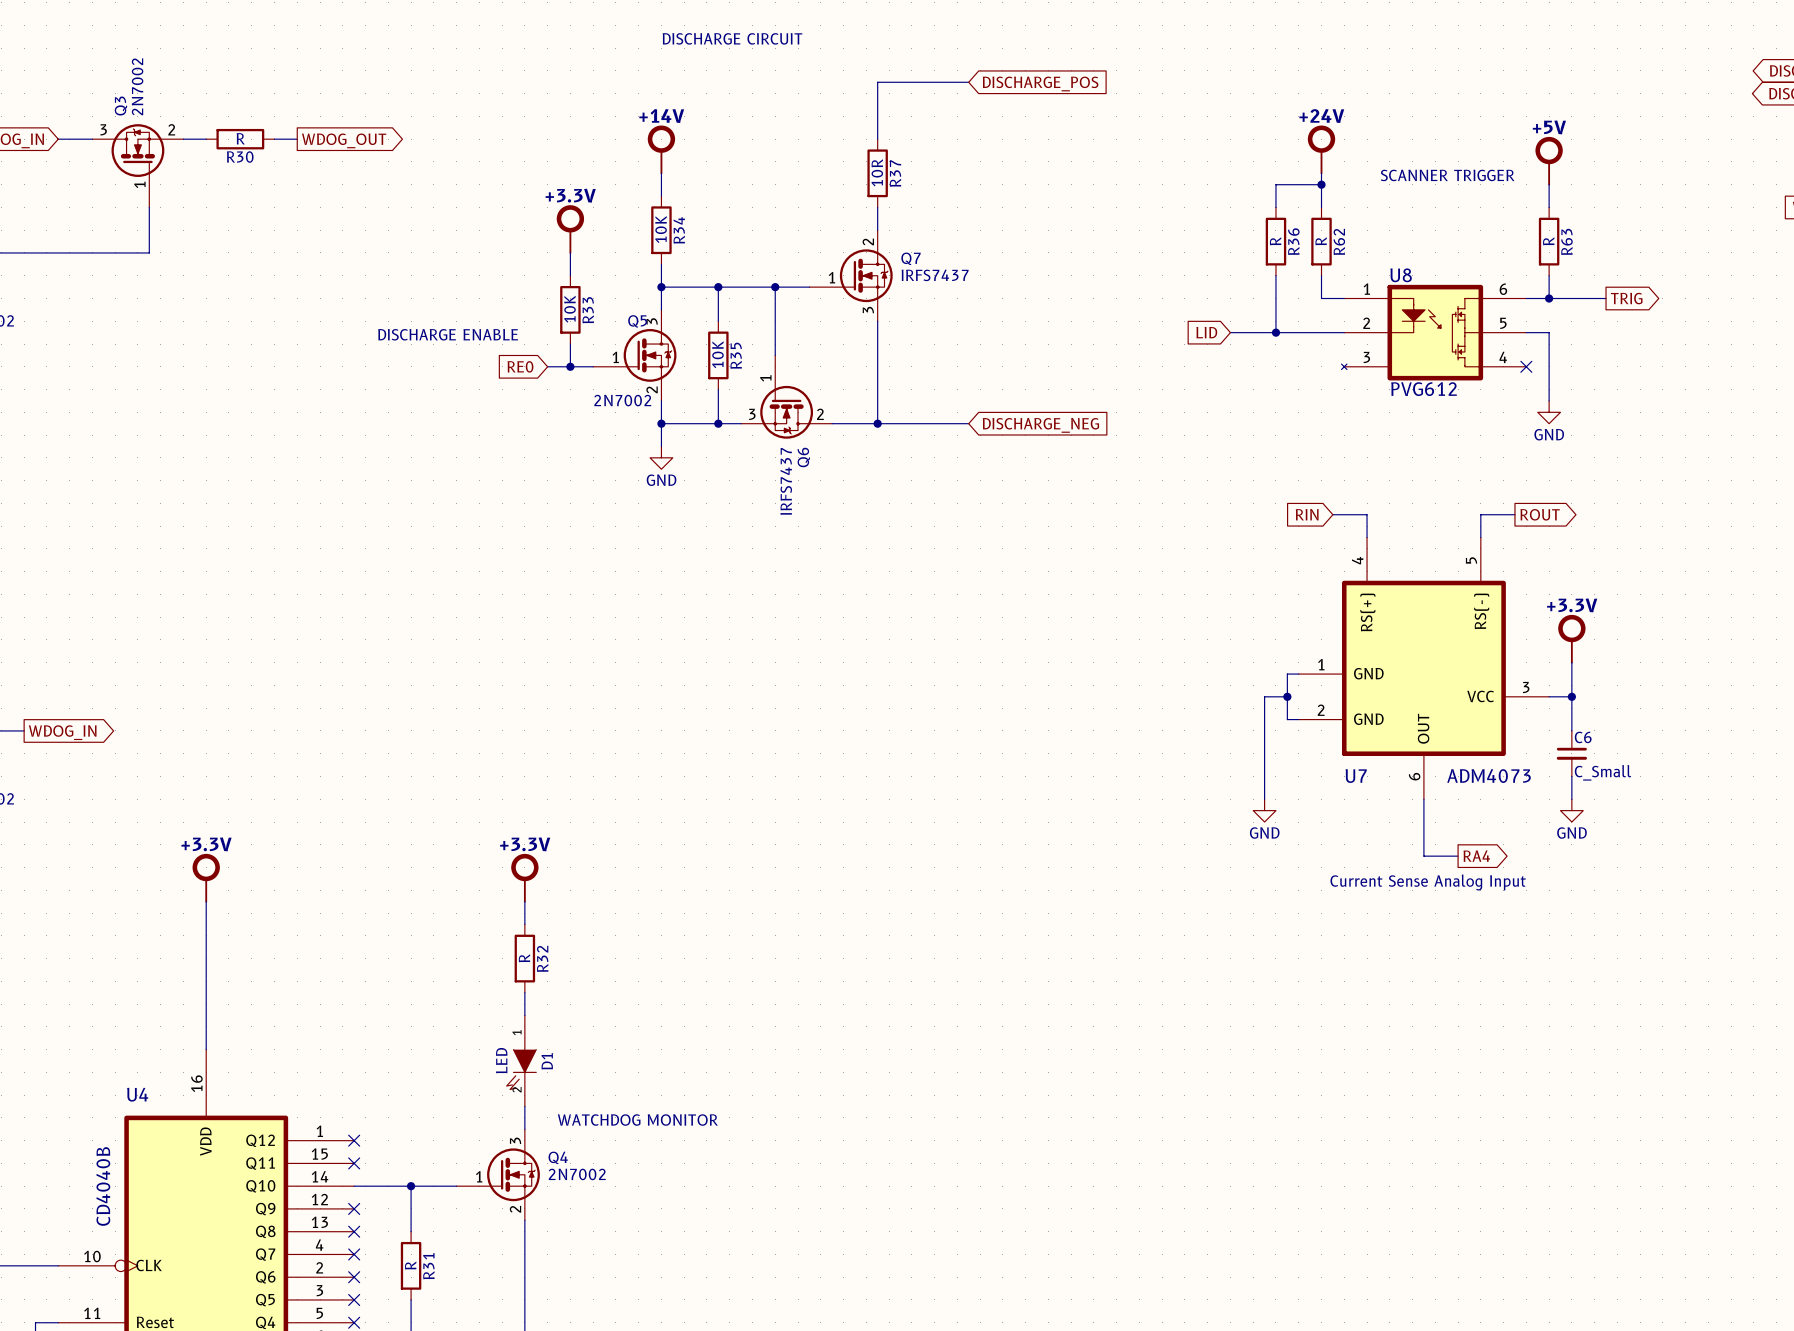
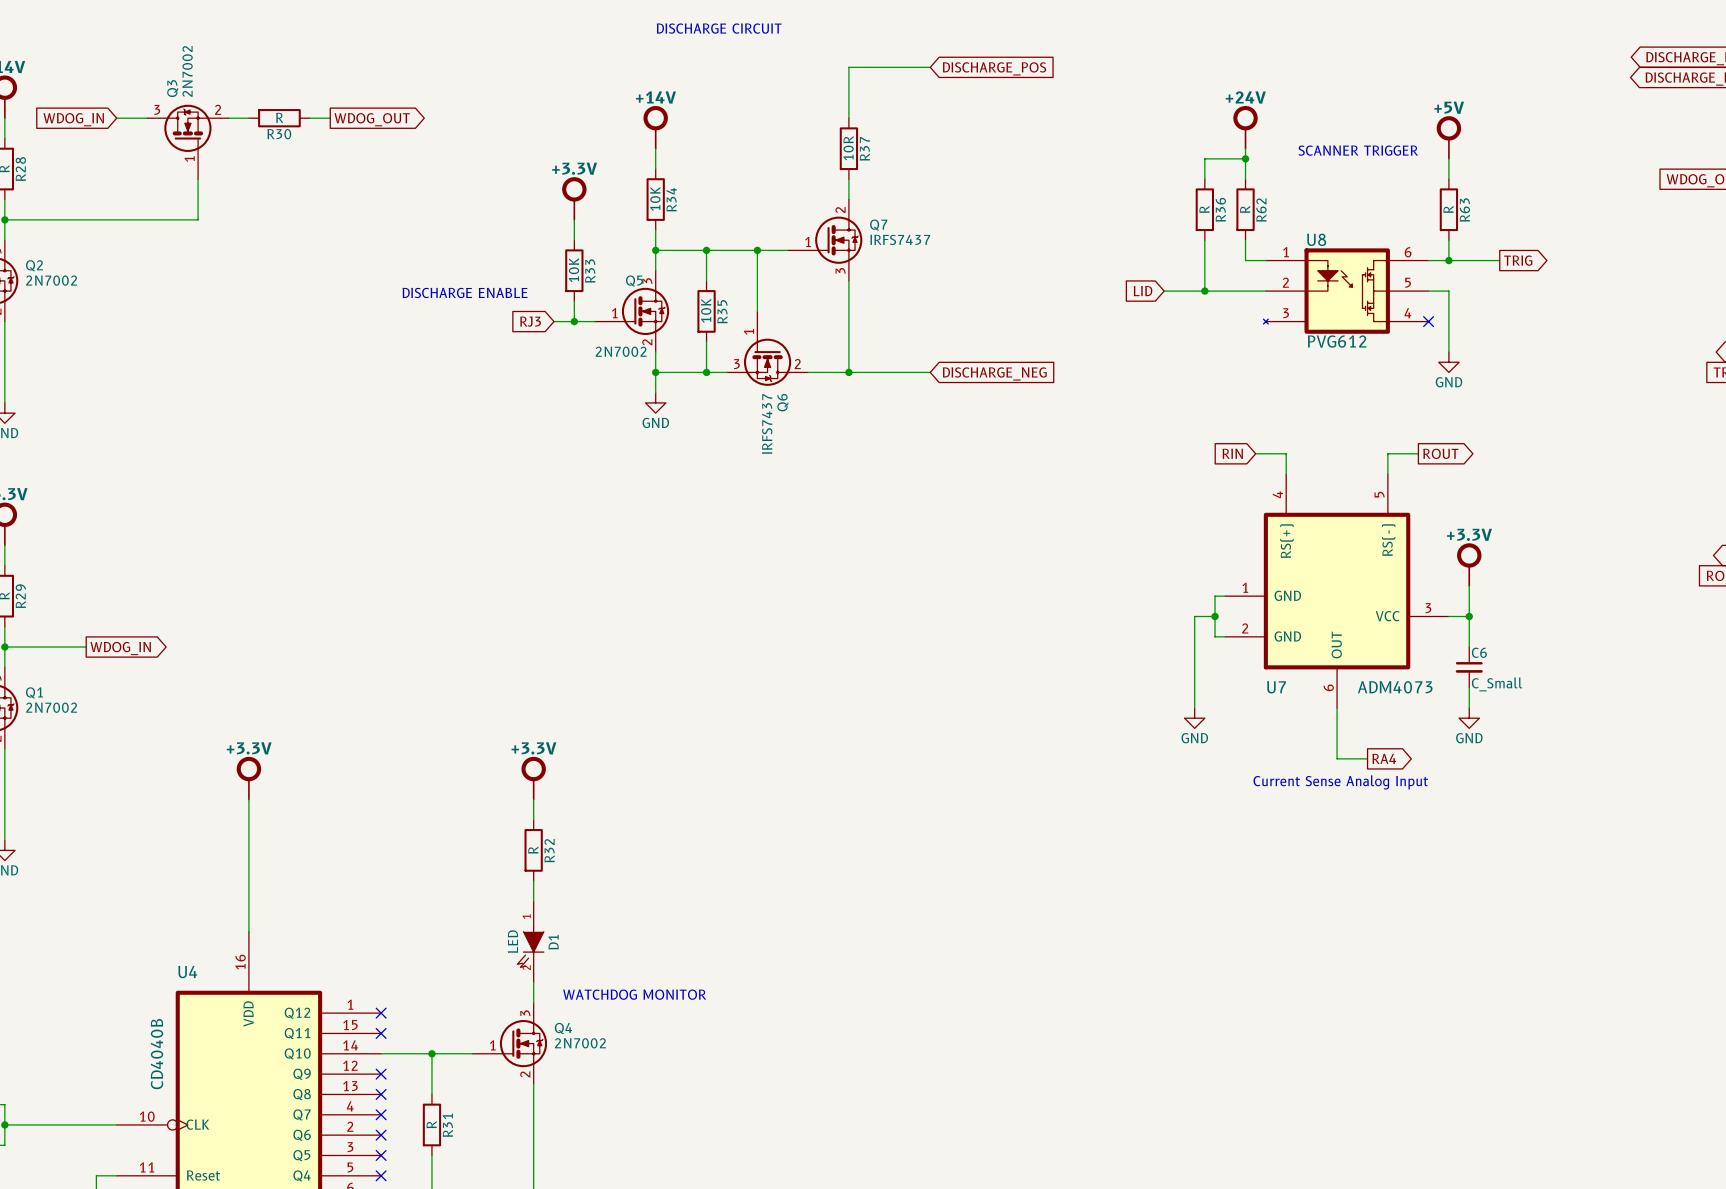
global label: RE0 (520, 366) -> RJ3 (530, 321)

